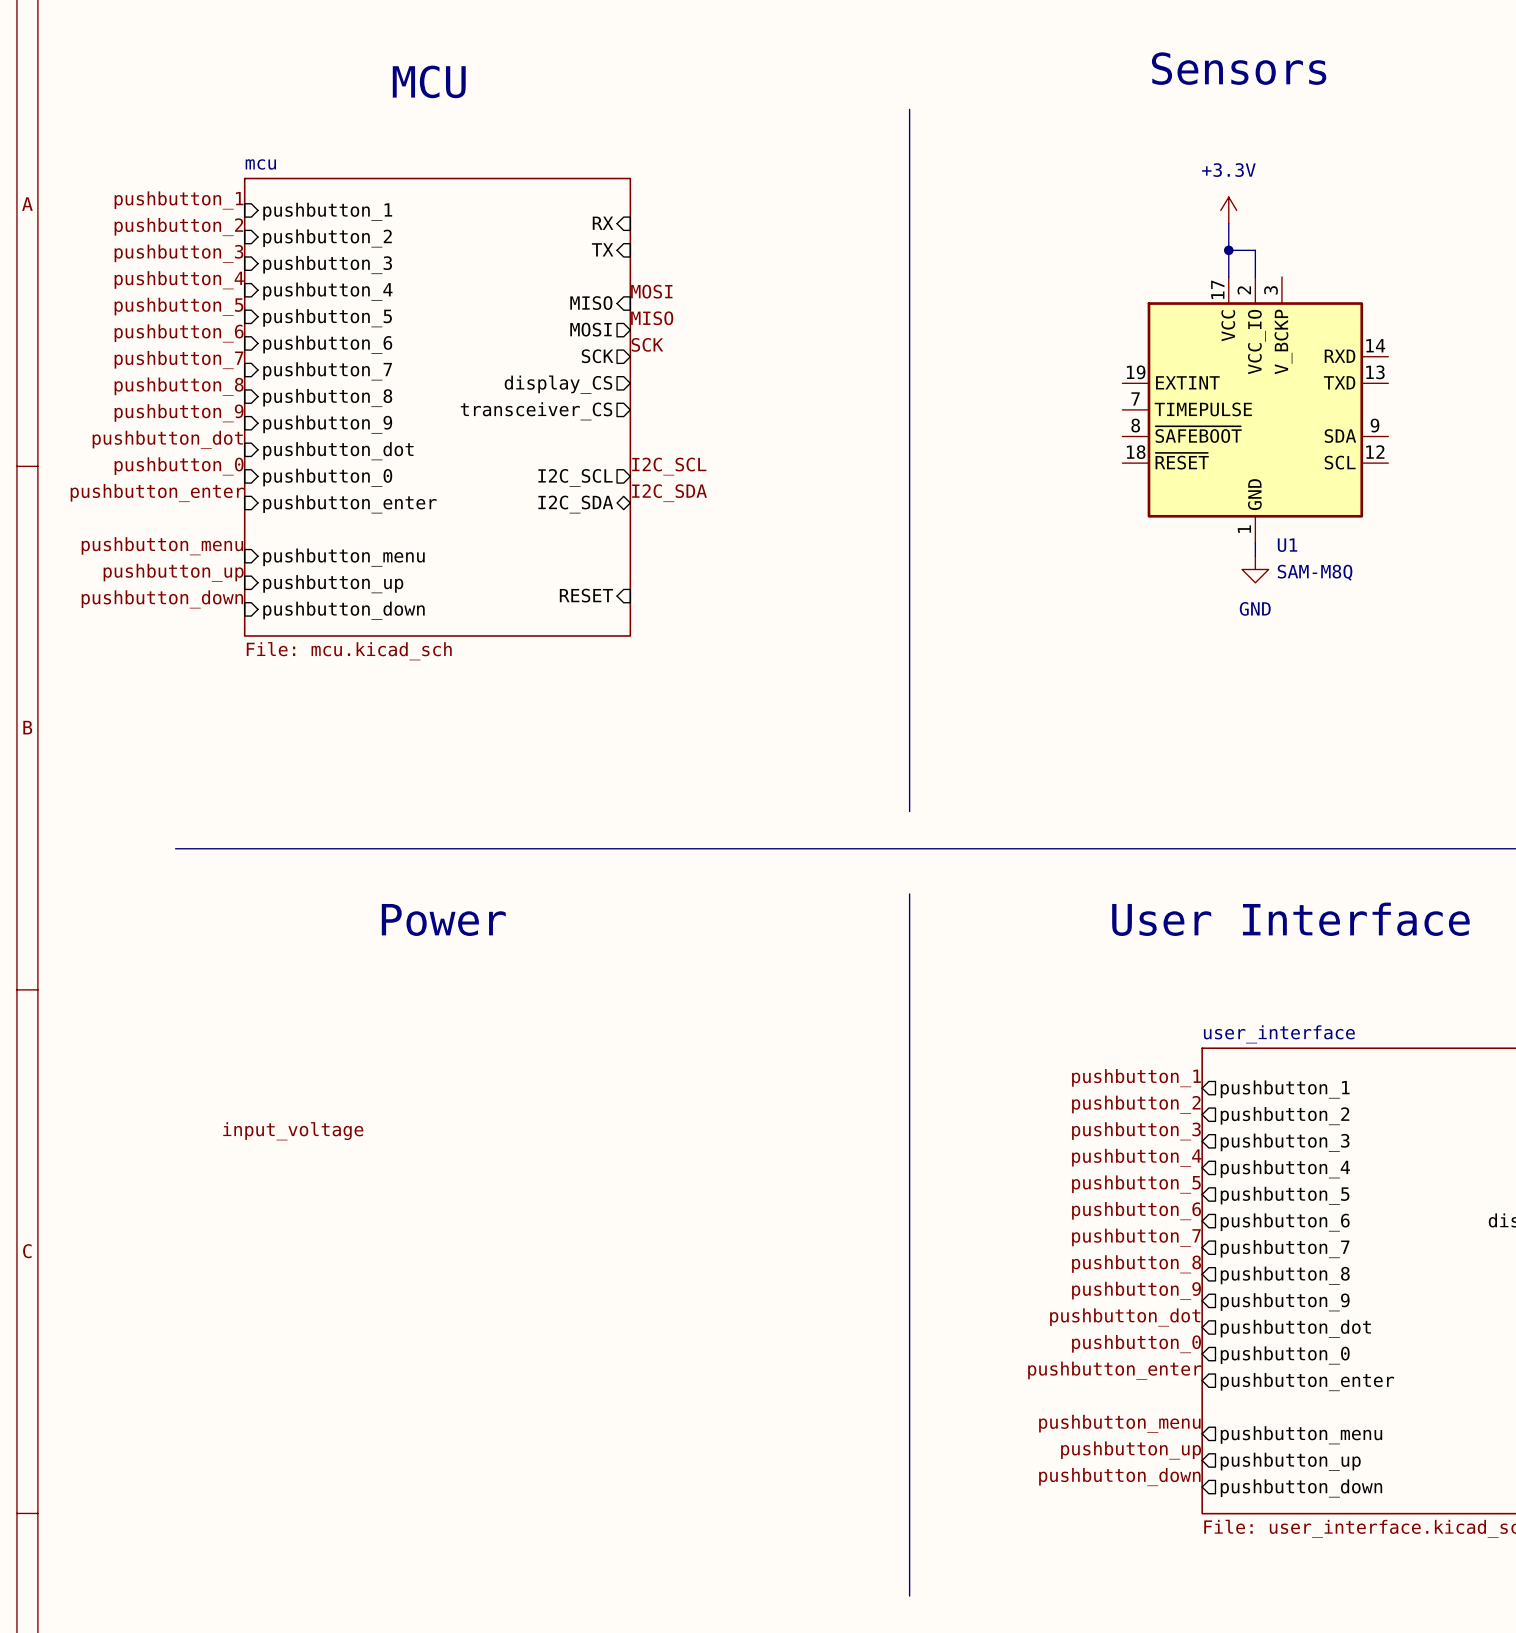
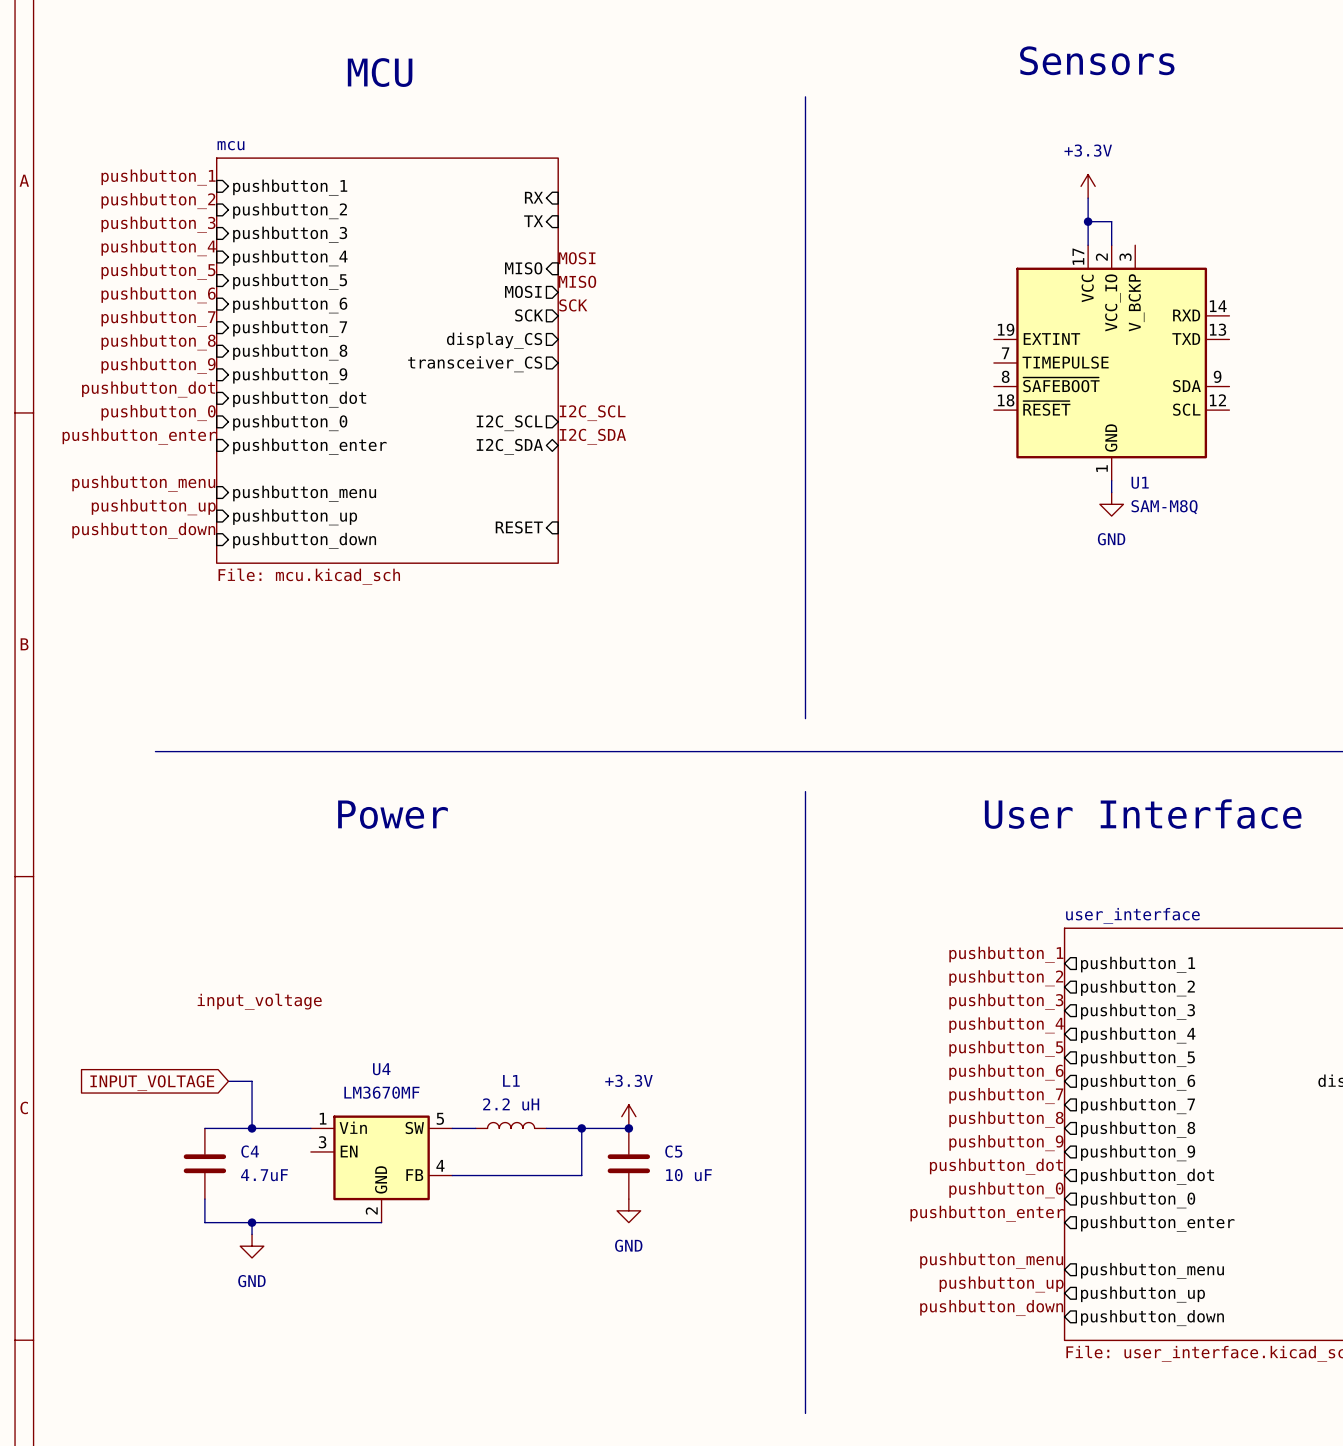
wire: none -> (228, 1081) (252, 1081) (252, 1128)
global label: none -> INPUT_VOLTAGE (152, 1083)
power symbol: none -> +3.3V (628, 1116)
L1: none -> 2.2 uH (511, 1125)
wire: none -> (204, 1128) (310, 1128)
junction: none -> (252, 1128)
wire: none -> (452, 1128) (475, 1128)
wire: none -> (546, 1128) (628, 1128)
wire: none -> (581, 1128) (581, 1175) (452, 1175)
junction: none -> (581, 1128)
junction: none -> (628, 1128)
C4: none -> 4.7uF (204, 1163)
C5: none -> 10 uF (628, 1163)
U4: none -> LM3670MF (381, 1169)
wire: none -> (204, 1199) (204, 1222) (381, 1222)
power symbol: none -> GND (628, 1210)
wire: none -> (252, 1222) (252, 1234)
junction: none -> (252, 1222)
power symbol: none -> GND (252, 1246)

